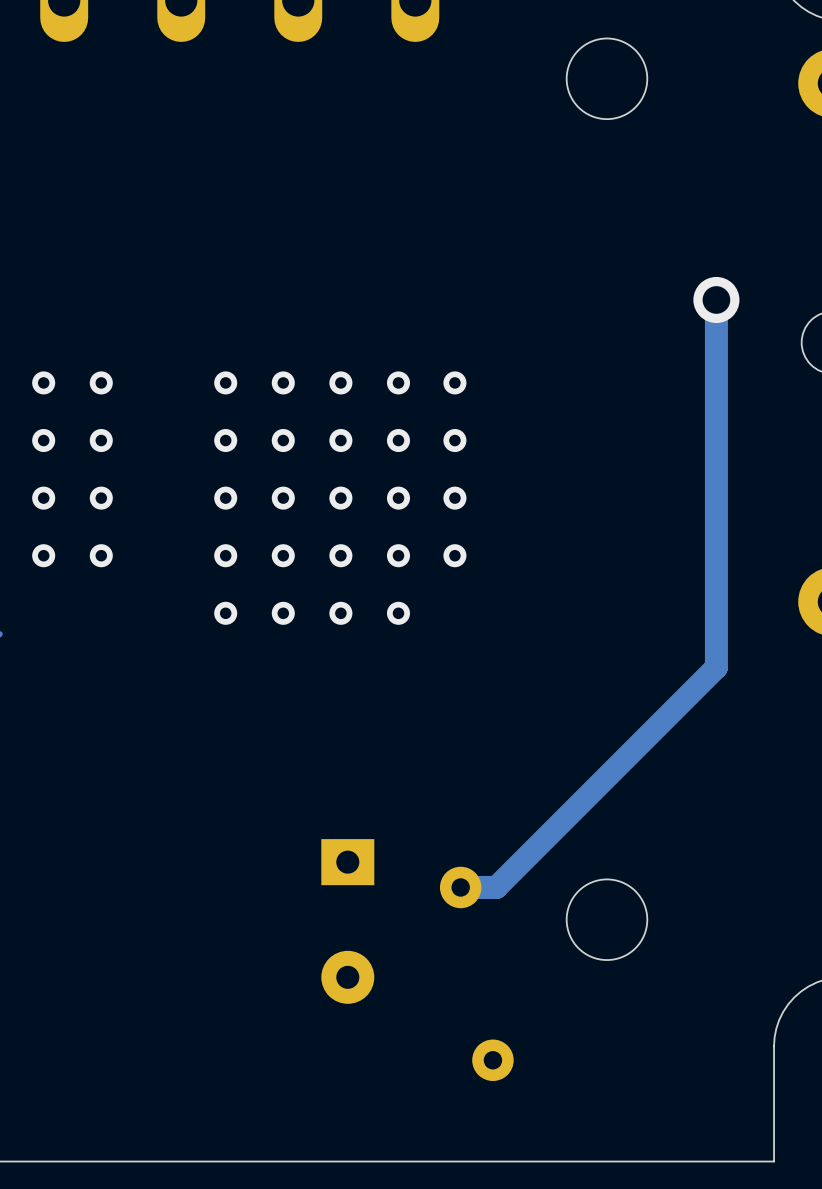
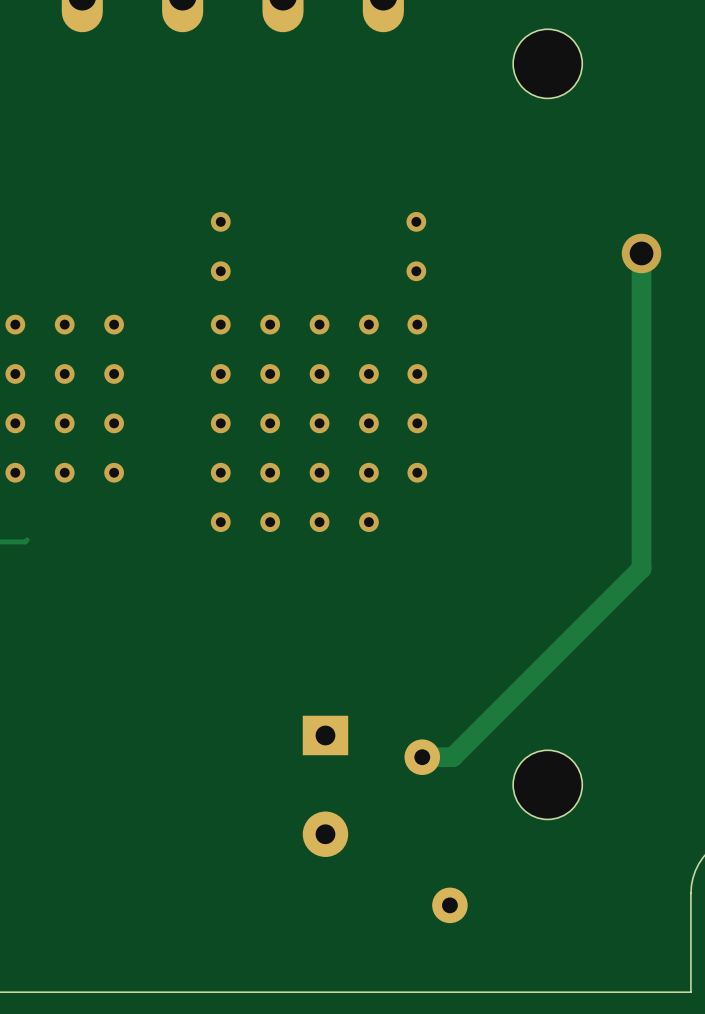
via: none -> (220, 221)
via: none -> (416, 221)
via: none -> (220, 271)
via: none -> (416, 271)

